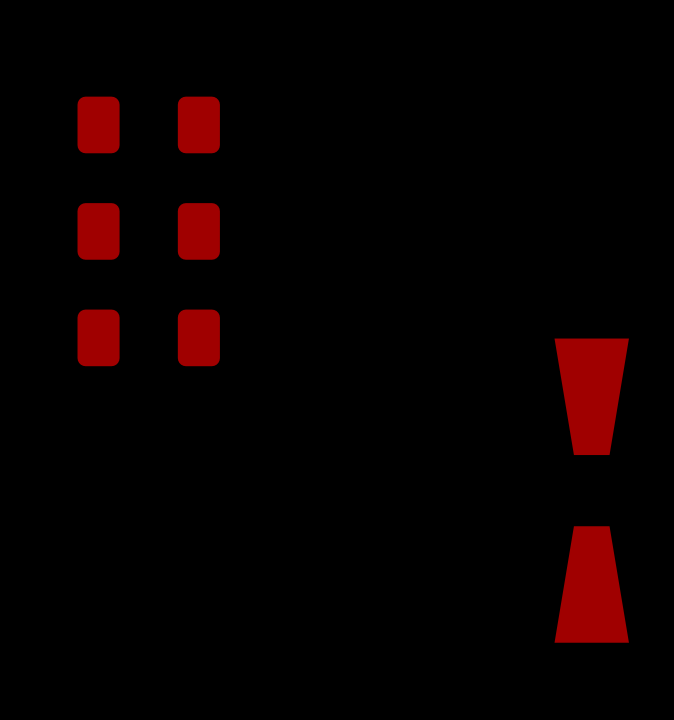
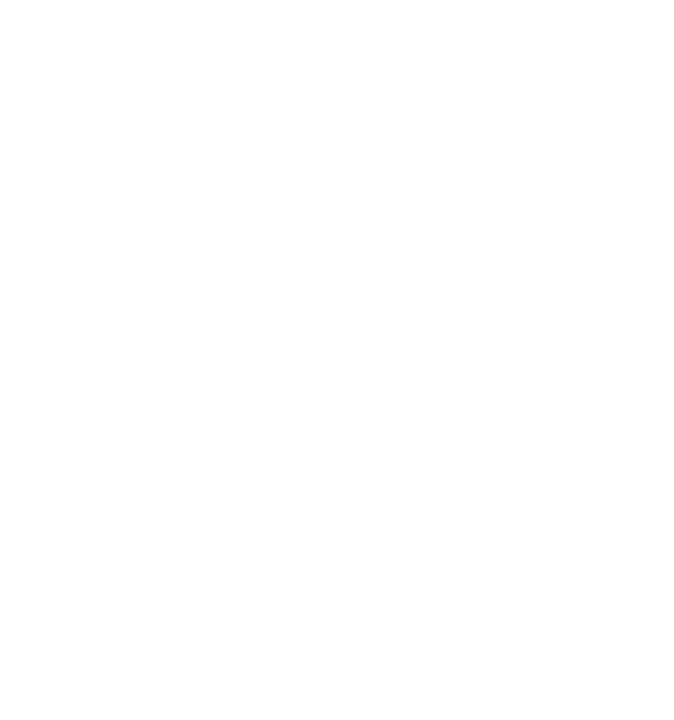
part: (148, 124) -> none
part: (148, 231) -> none
part: (148, 337) -> none
part: (591, 490) -> none

